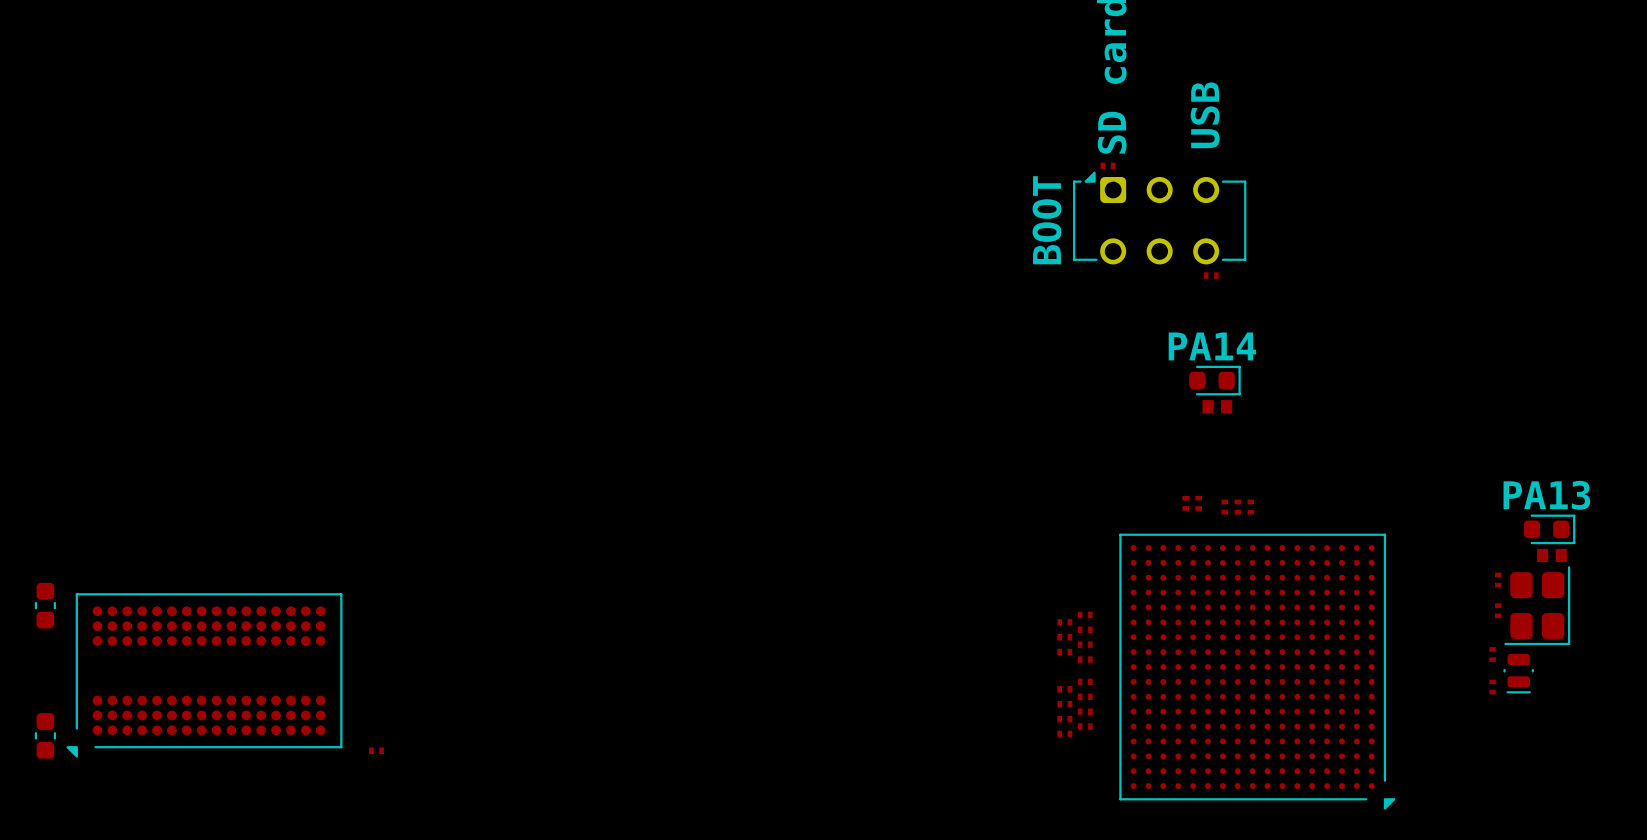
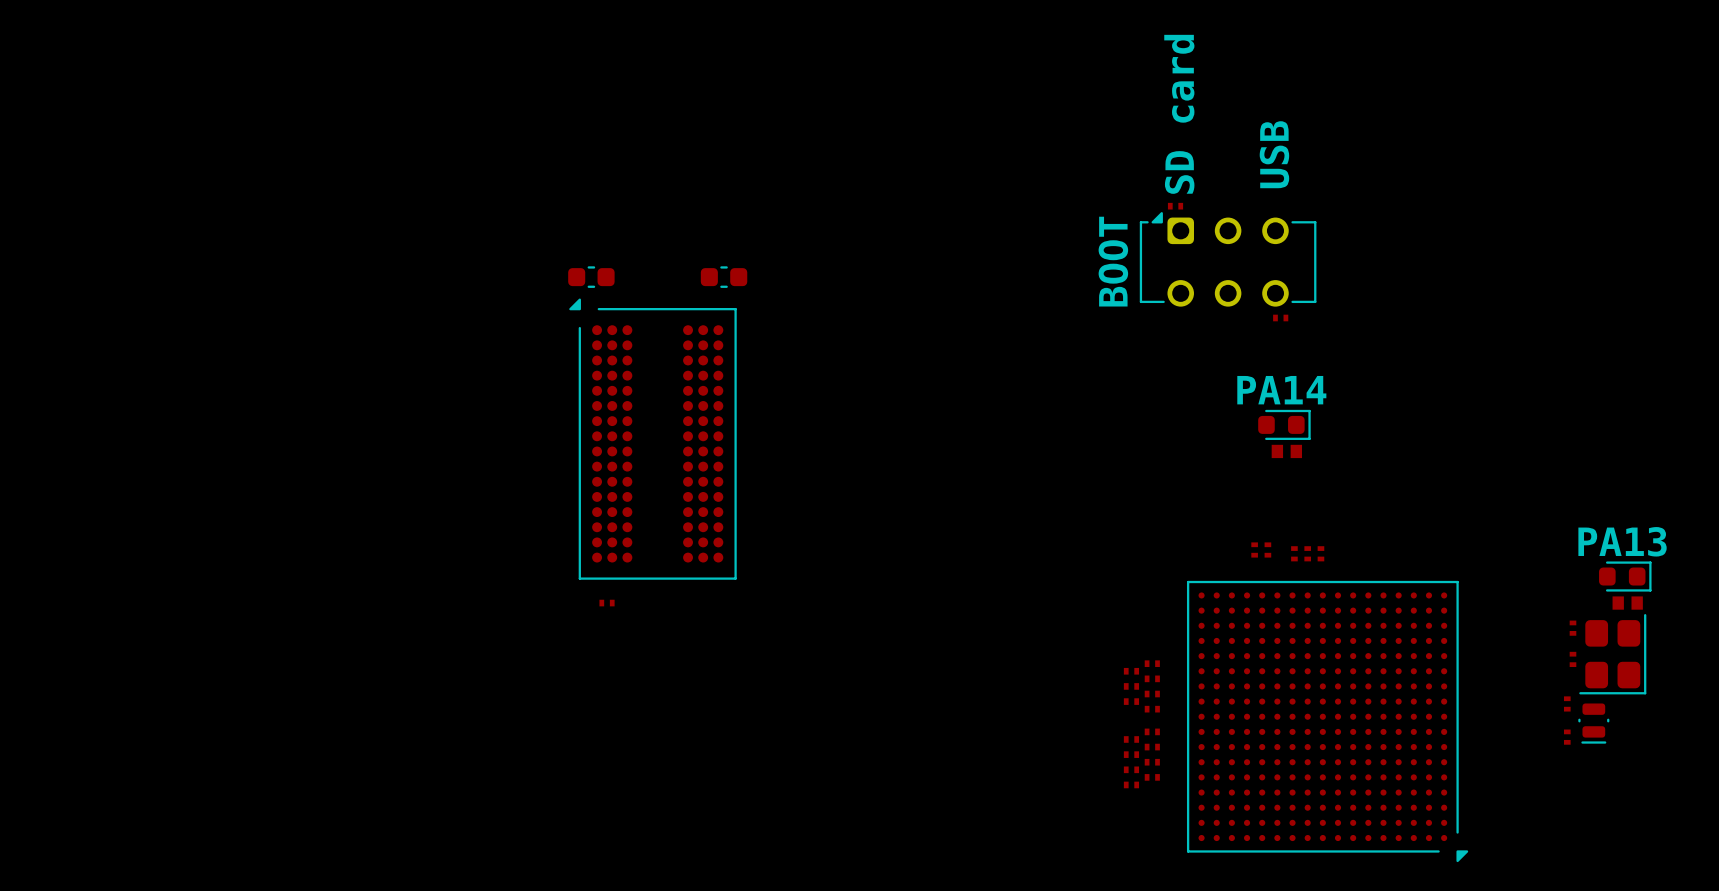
part: none -> (591, 277)
part: none -> (724, 277)
part: none -> (652, 439)
part: (45, 605) -> none
part: (204, 675) -> none
part: (45, 735) -> none
part position: (376, 750) -> (607, 603)

